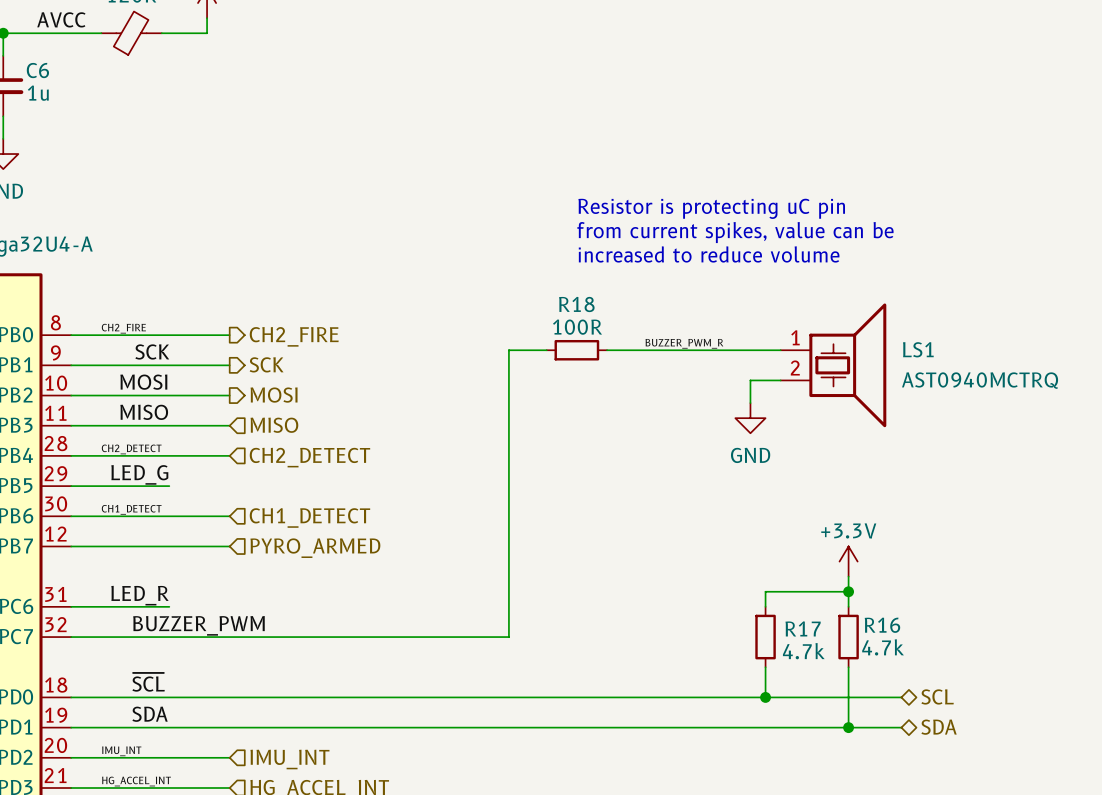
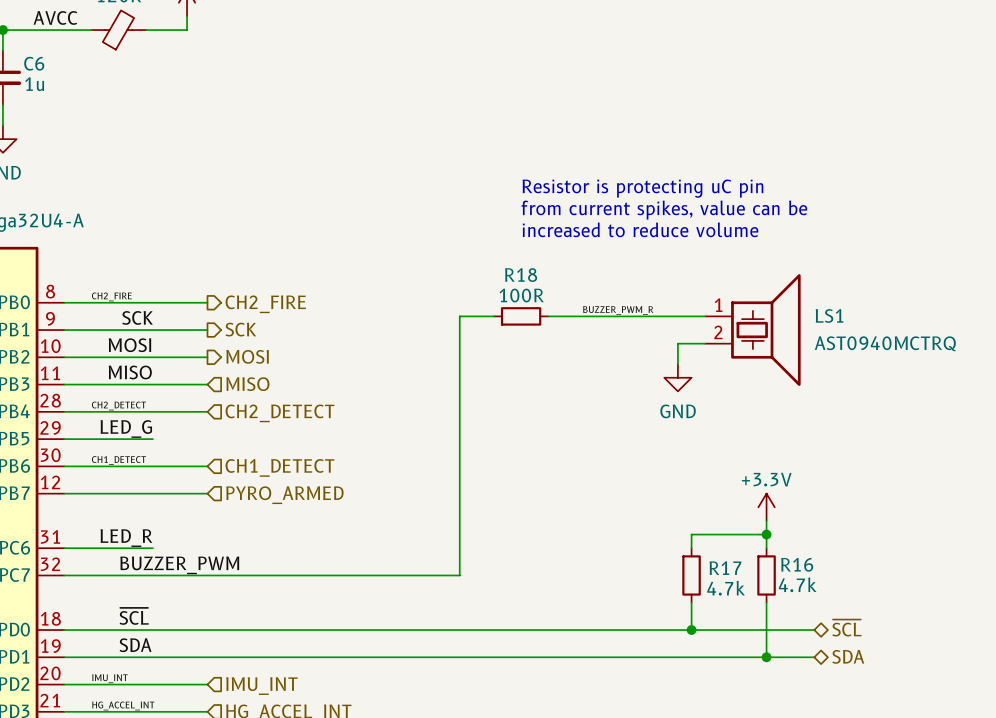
hierarchical label: SCL (937, 696) -> ~{SCL} (846, 628)

